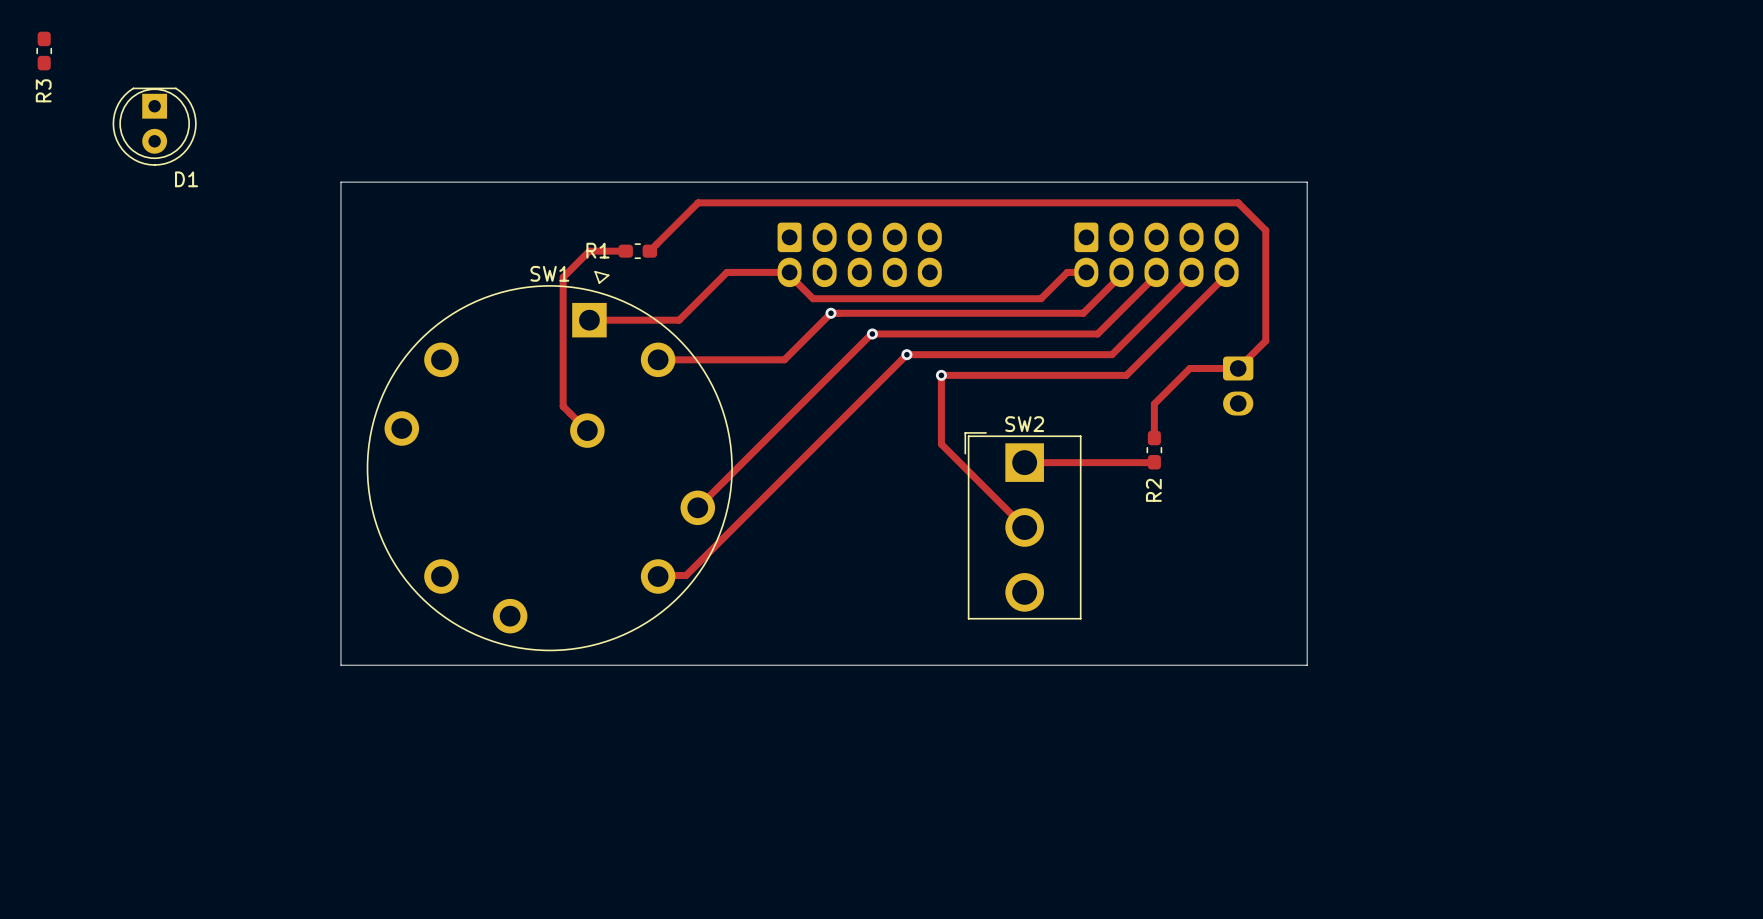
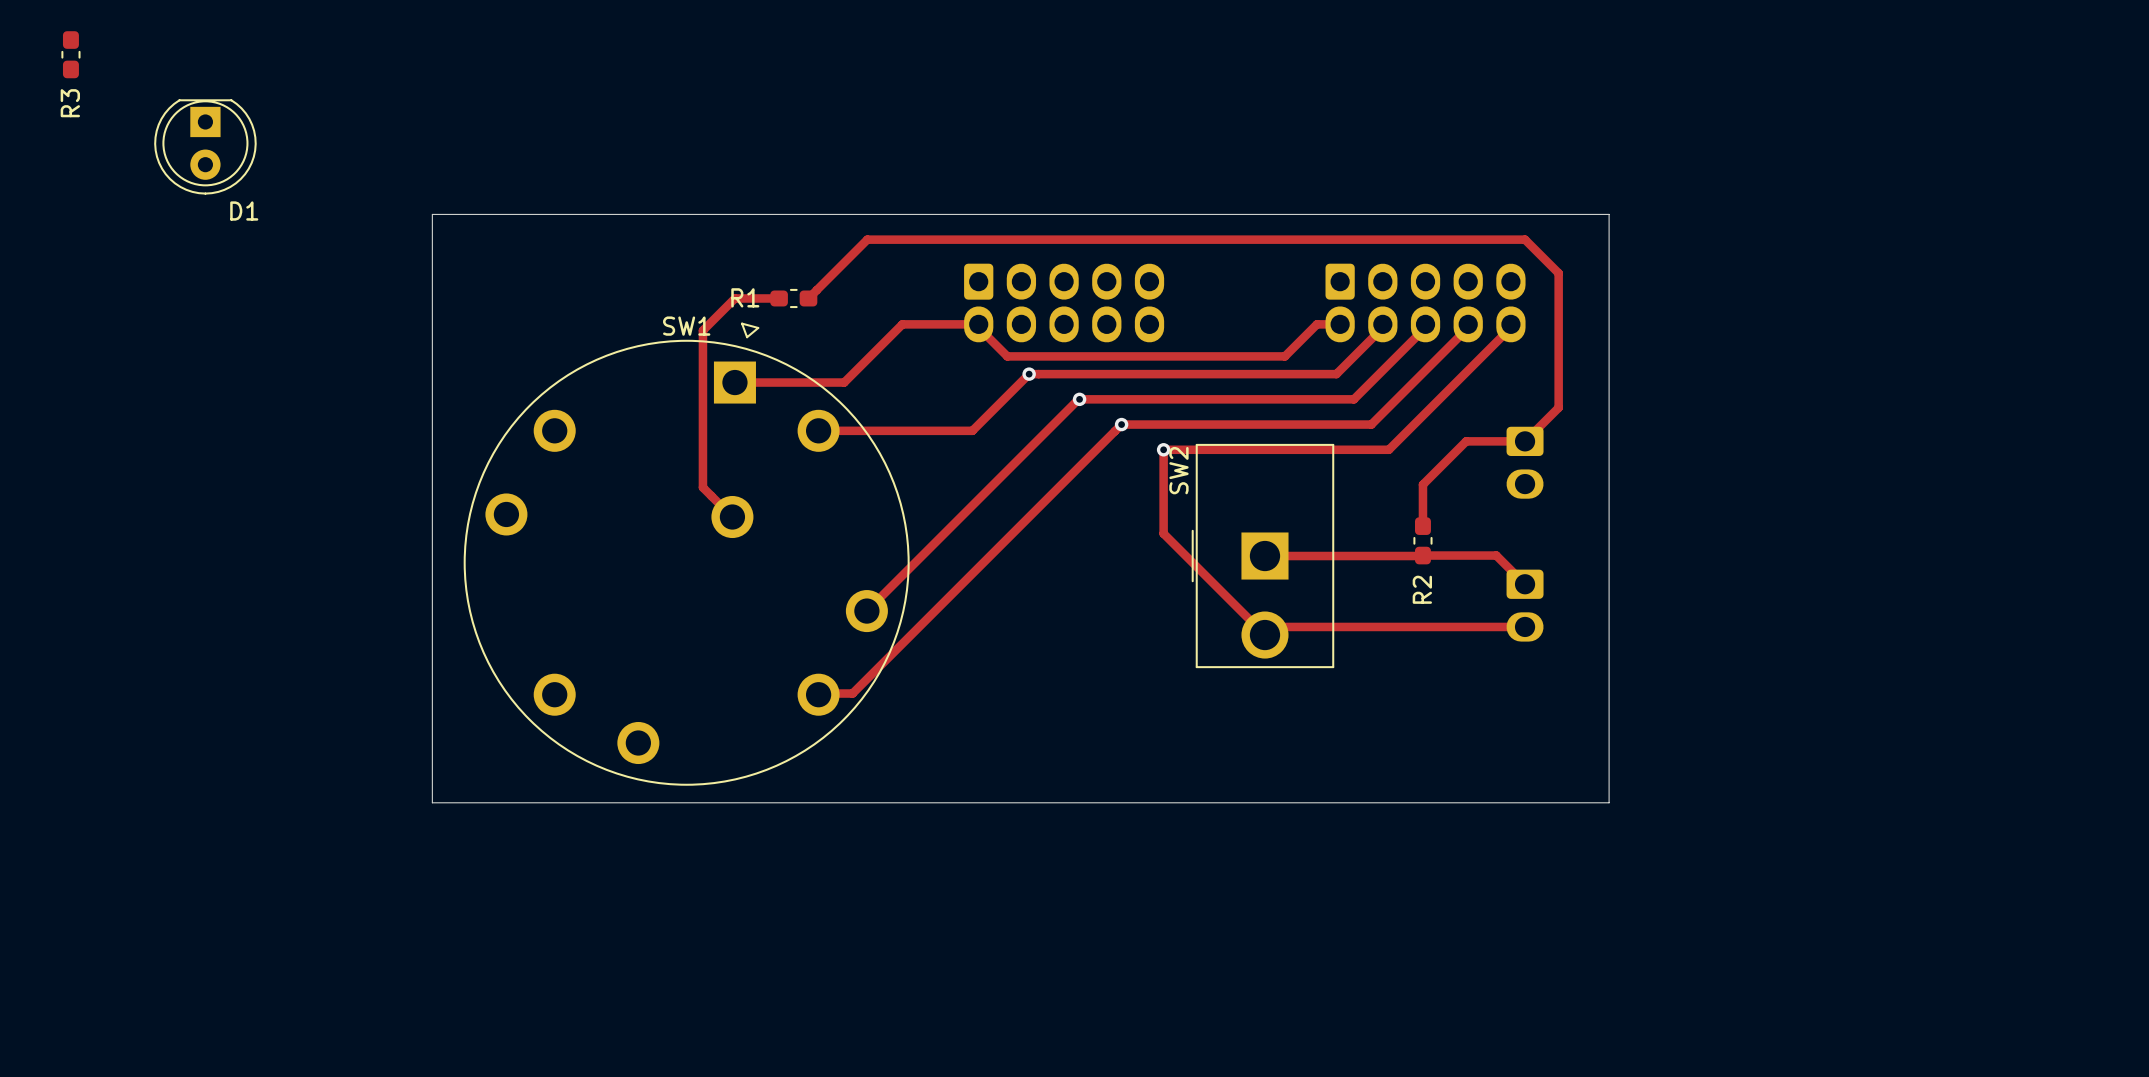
SW2 name position: SW2 (1024, 424) -> SW2 (1178, 470)
SW2 footprint: [964, 432, 1082, 620] -> [1191, 443, 1335, 669]
track: none -> (1422, 555) (1496, 555) (1525, 584)
part: none -> (1525, 605)
track: none -> (1525, 626) (1273, 626) (1264, 635)

